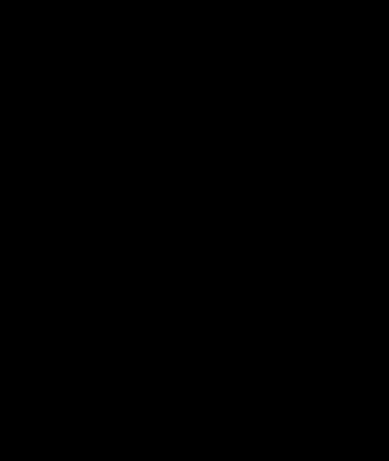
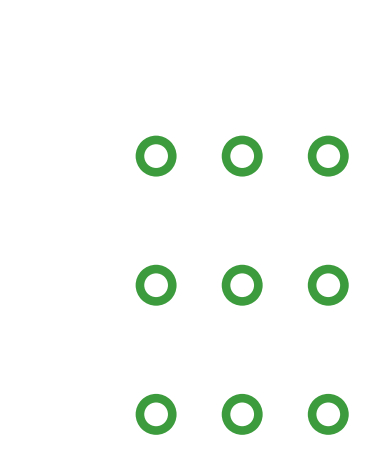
part: none -> (242, 156)
part: none -> (242, 285)
part: none -> (242, 414)

